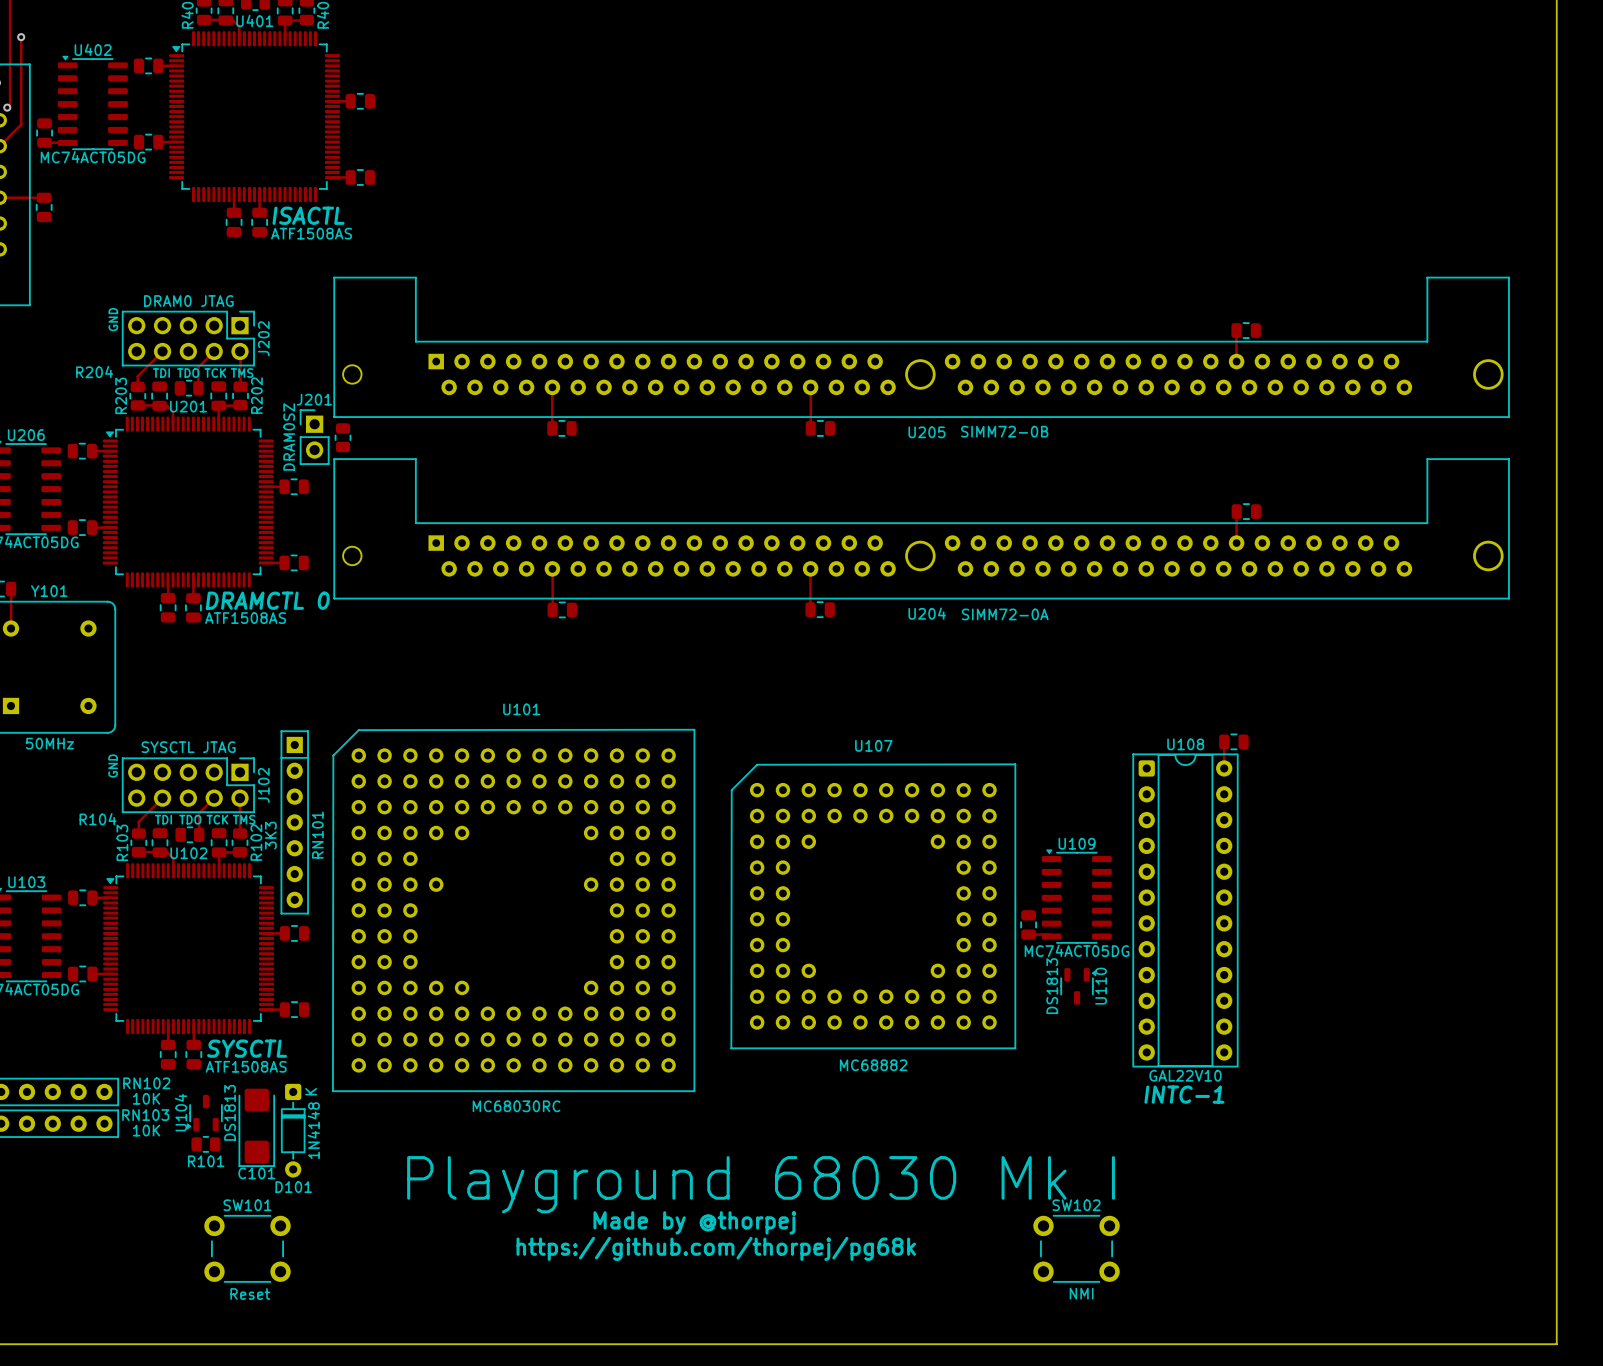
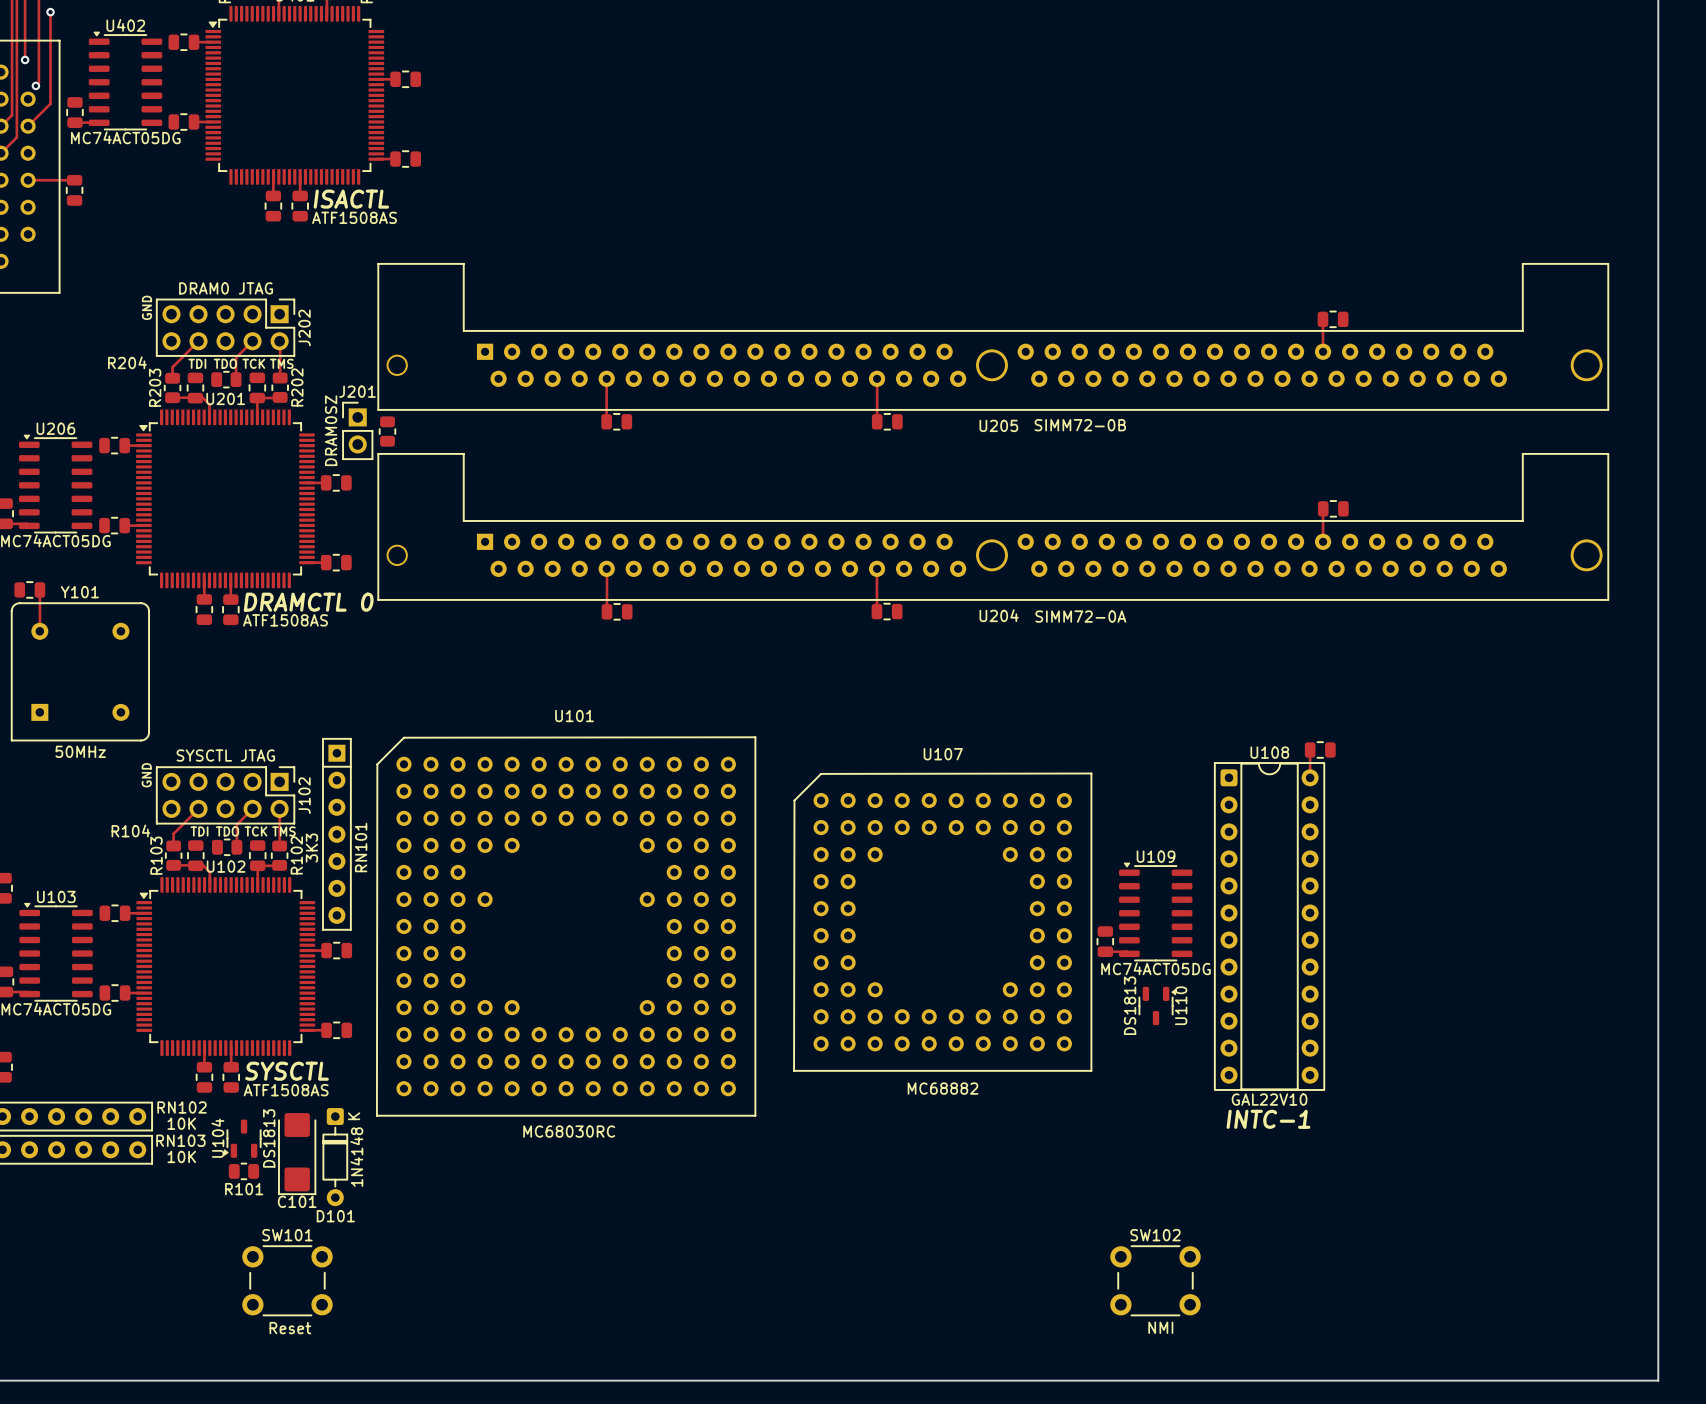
text: Playground 68030 Mk I (761, 1184) -> none
text: Made by @thorpej (694, 1222) -> none
text: https://github.com/thorpej/pg68k (716, 1248) -> none

